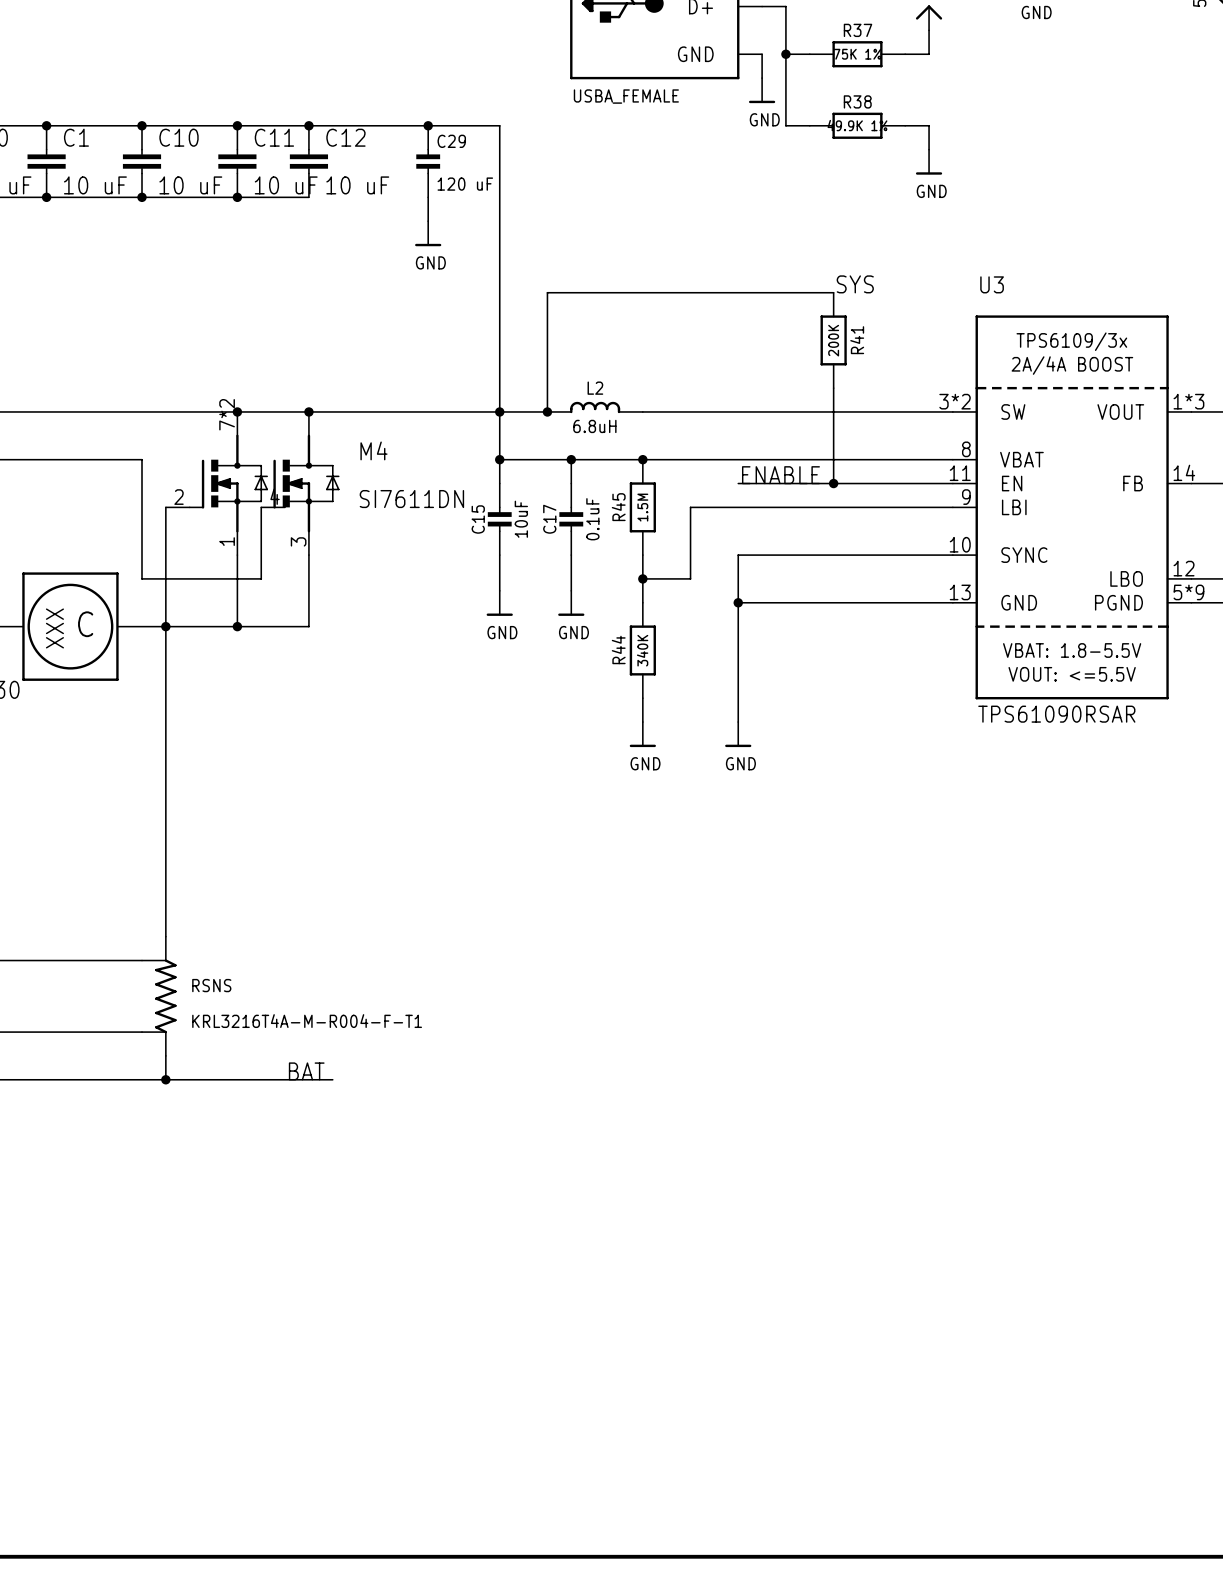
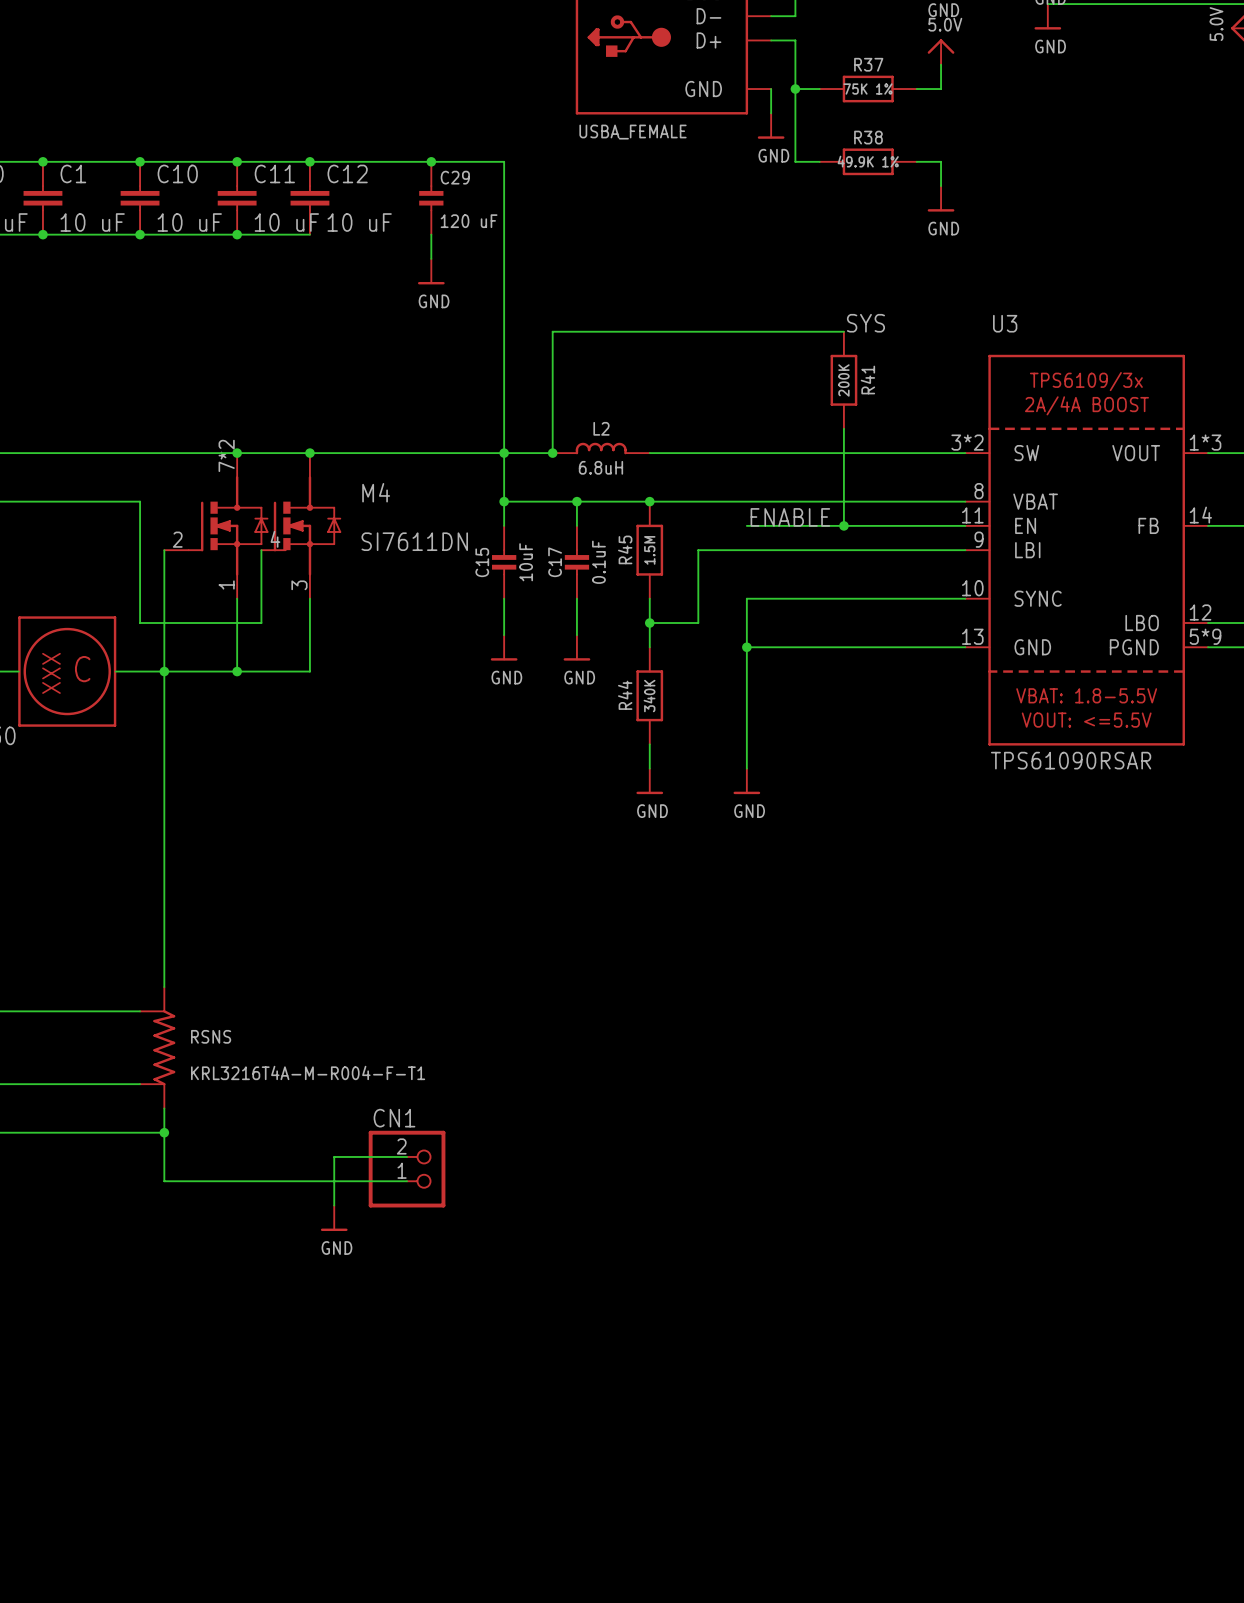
label: BAT (306, 1071) -> none
wire: (165, 1079) (332, 1079) -> (164, 1132) (164, 1181) (407, 1181)
wire: none -> (407, 1156) (334, 1156) (334, 1205)
CN1: none -> (407, 1169)
power symbol: none -> GND (334, 1218)

